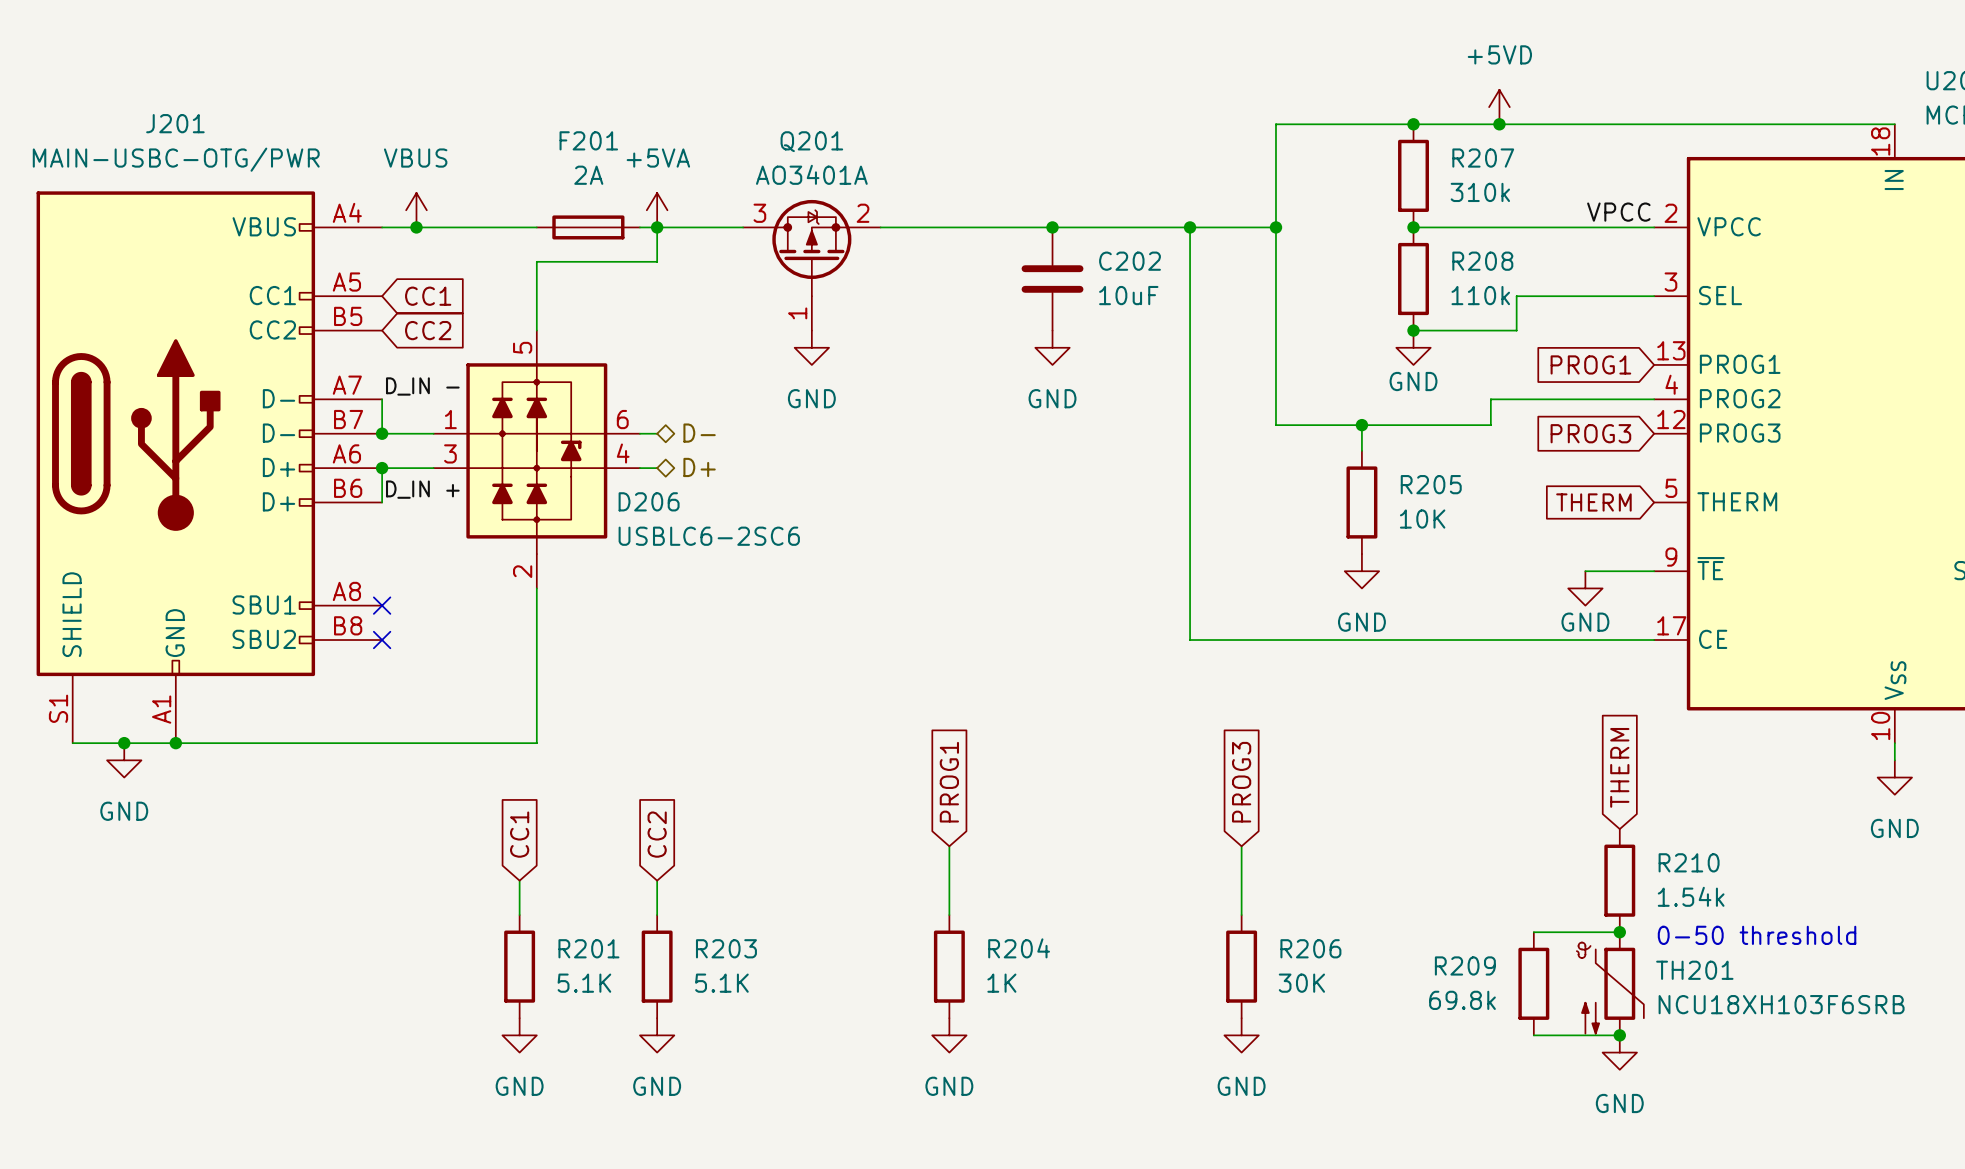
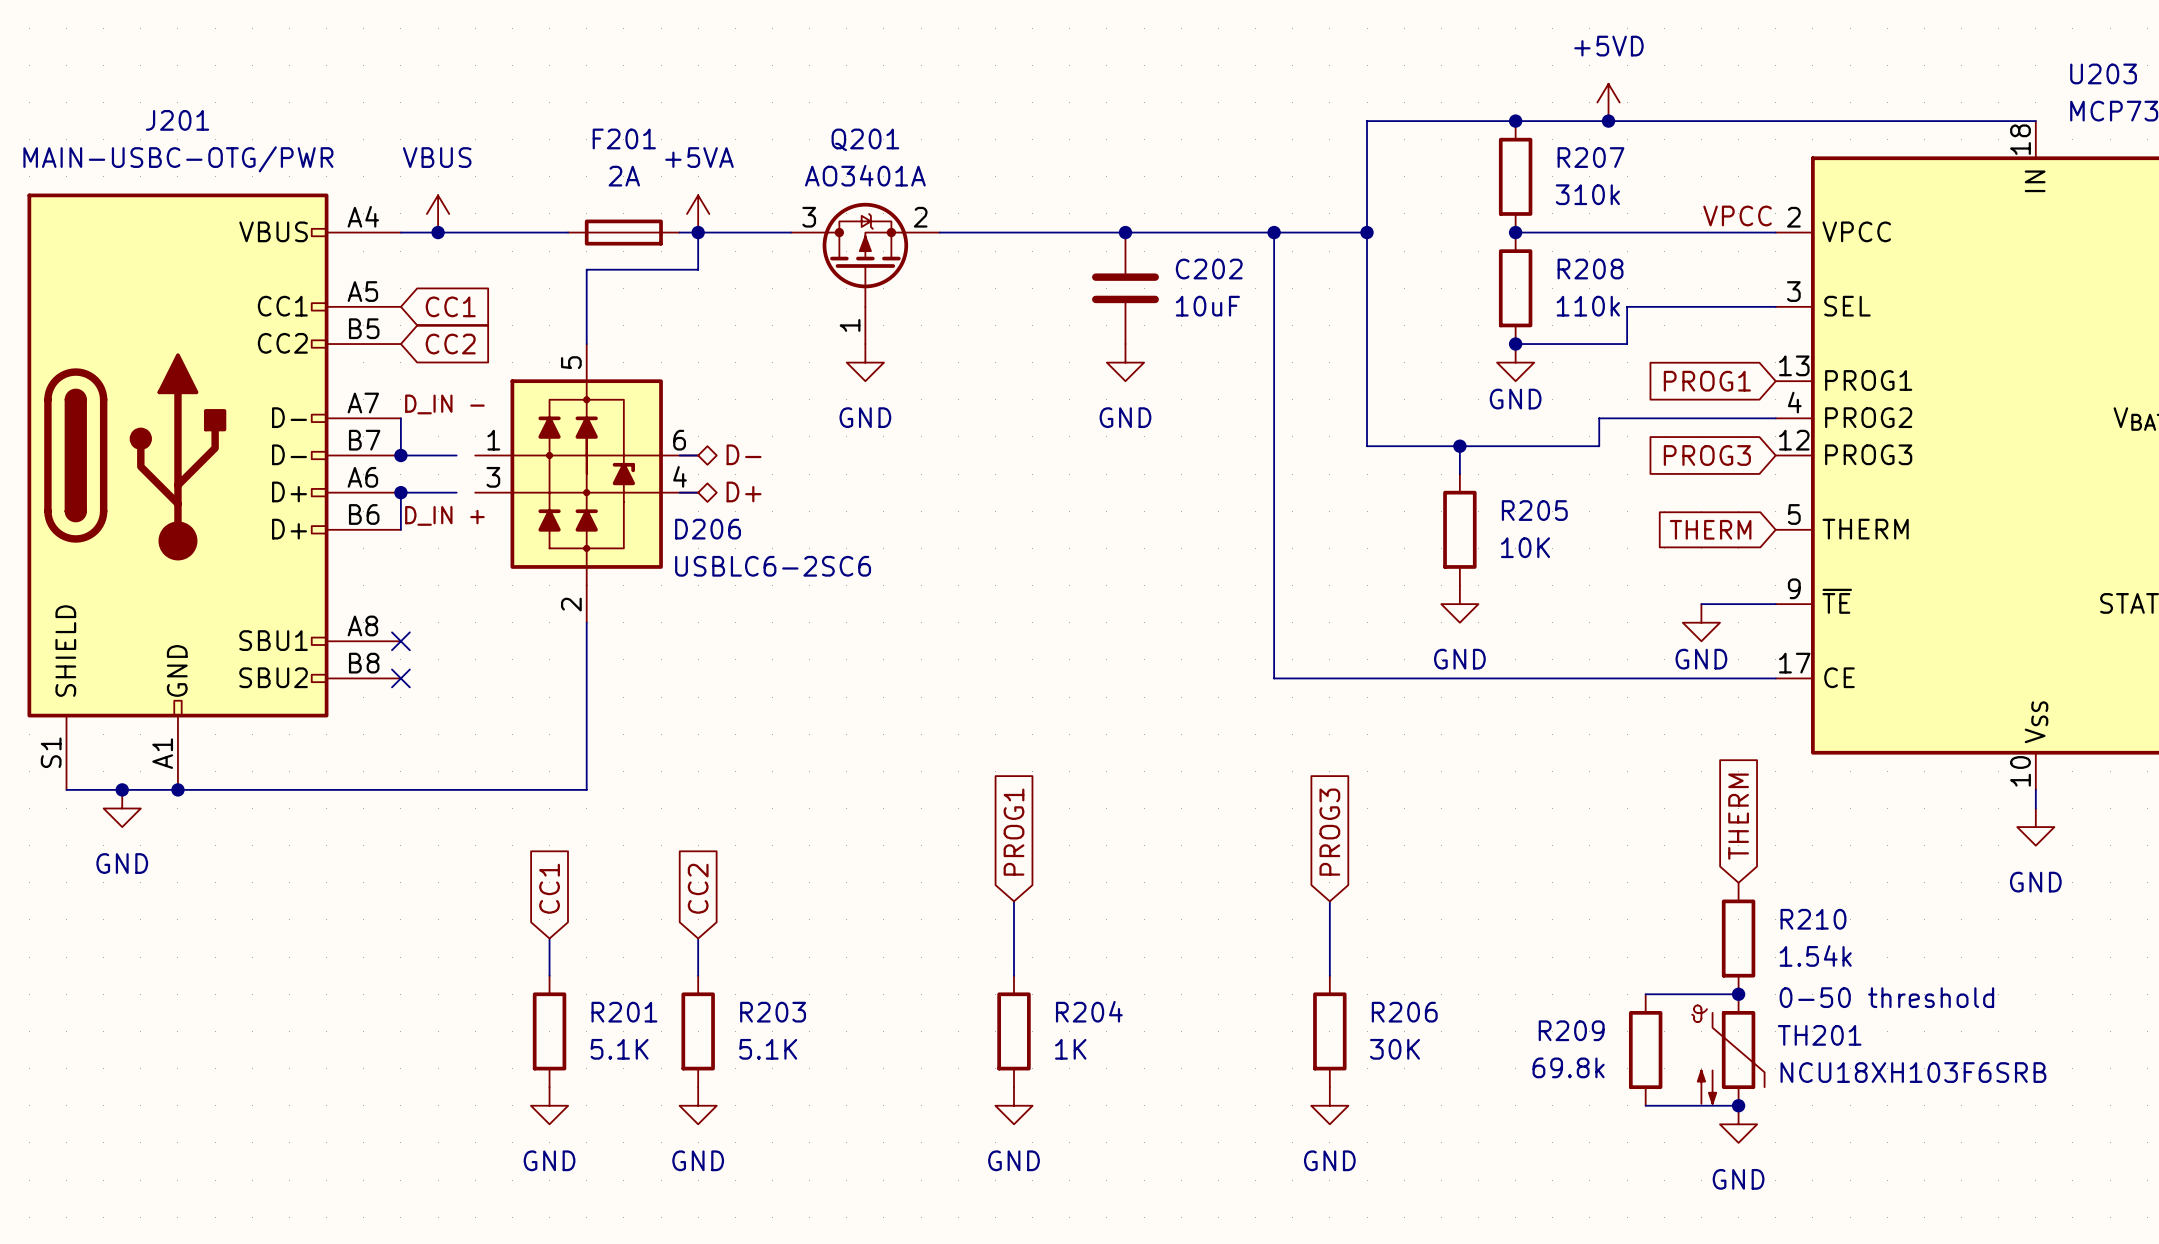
wire: (554, 261) (536, 261) (536, 330) -> (586, 269) (586, 344)
D206 position: (536, 459) -> (586, 483)
wire: (536, 588) (536, 743) -> (586, 622) (586, 789) (568, 789)

